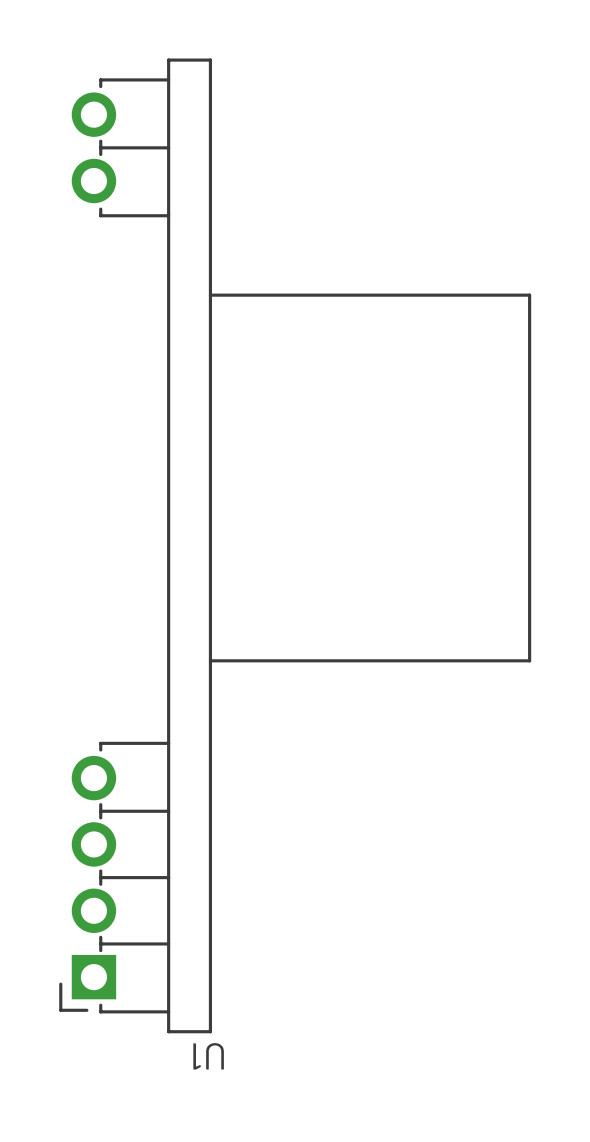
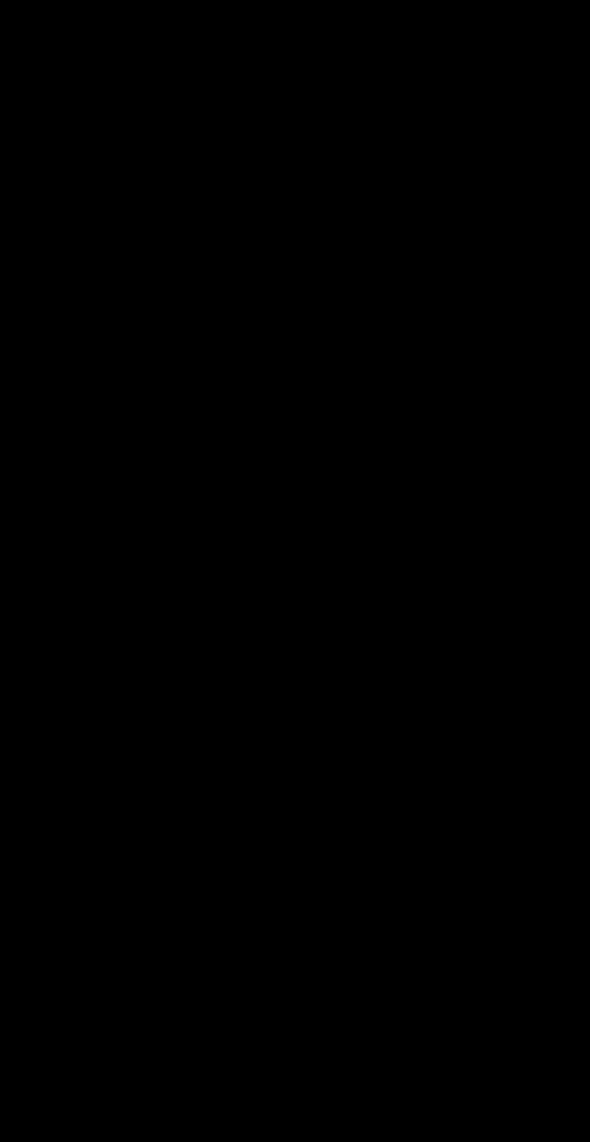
U1: (295, 545) -> none

